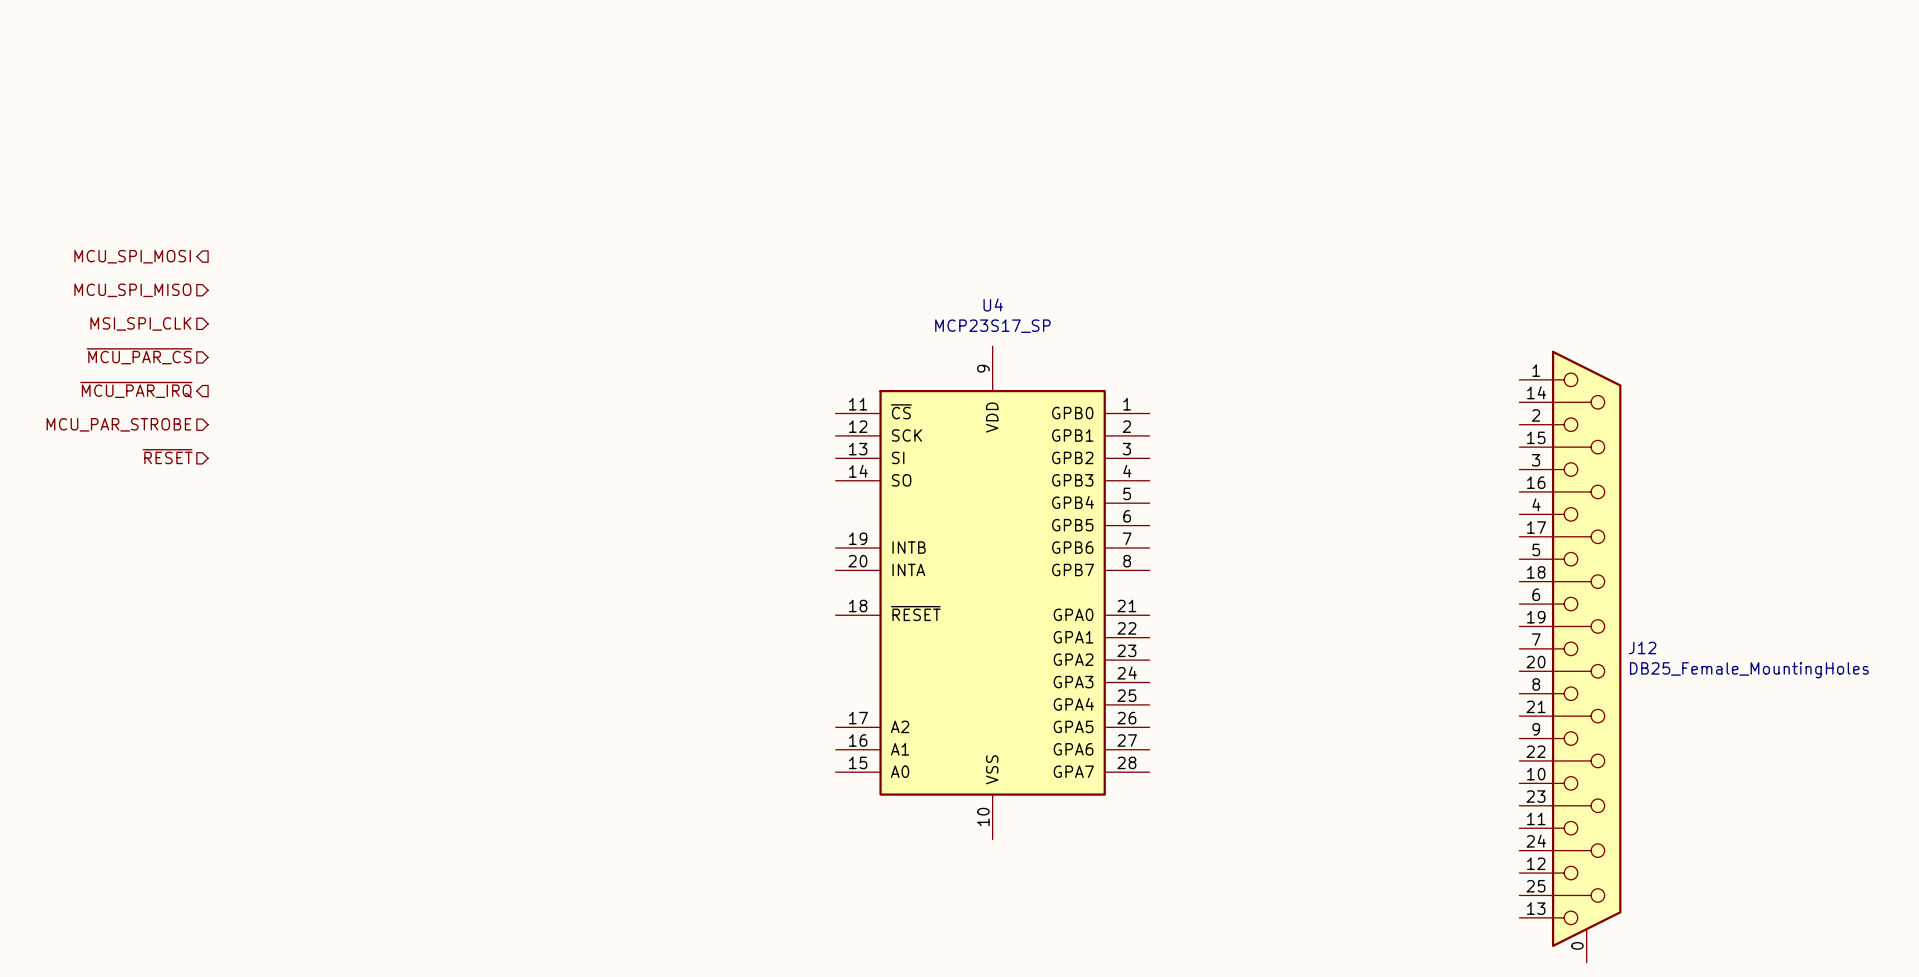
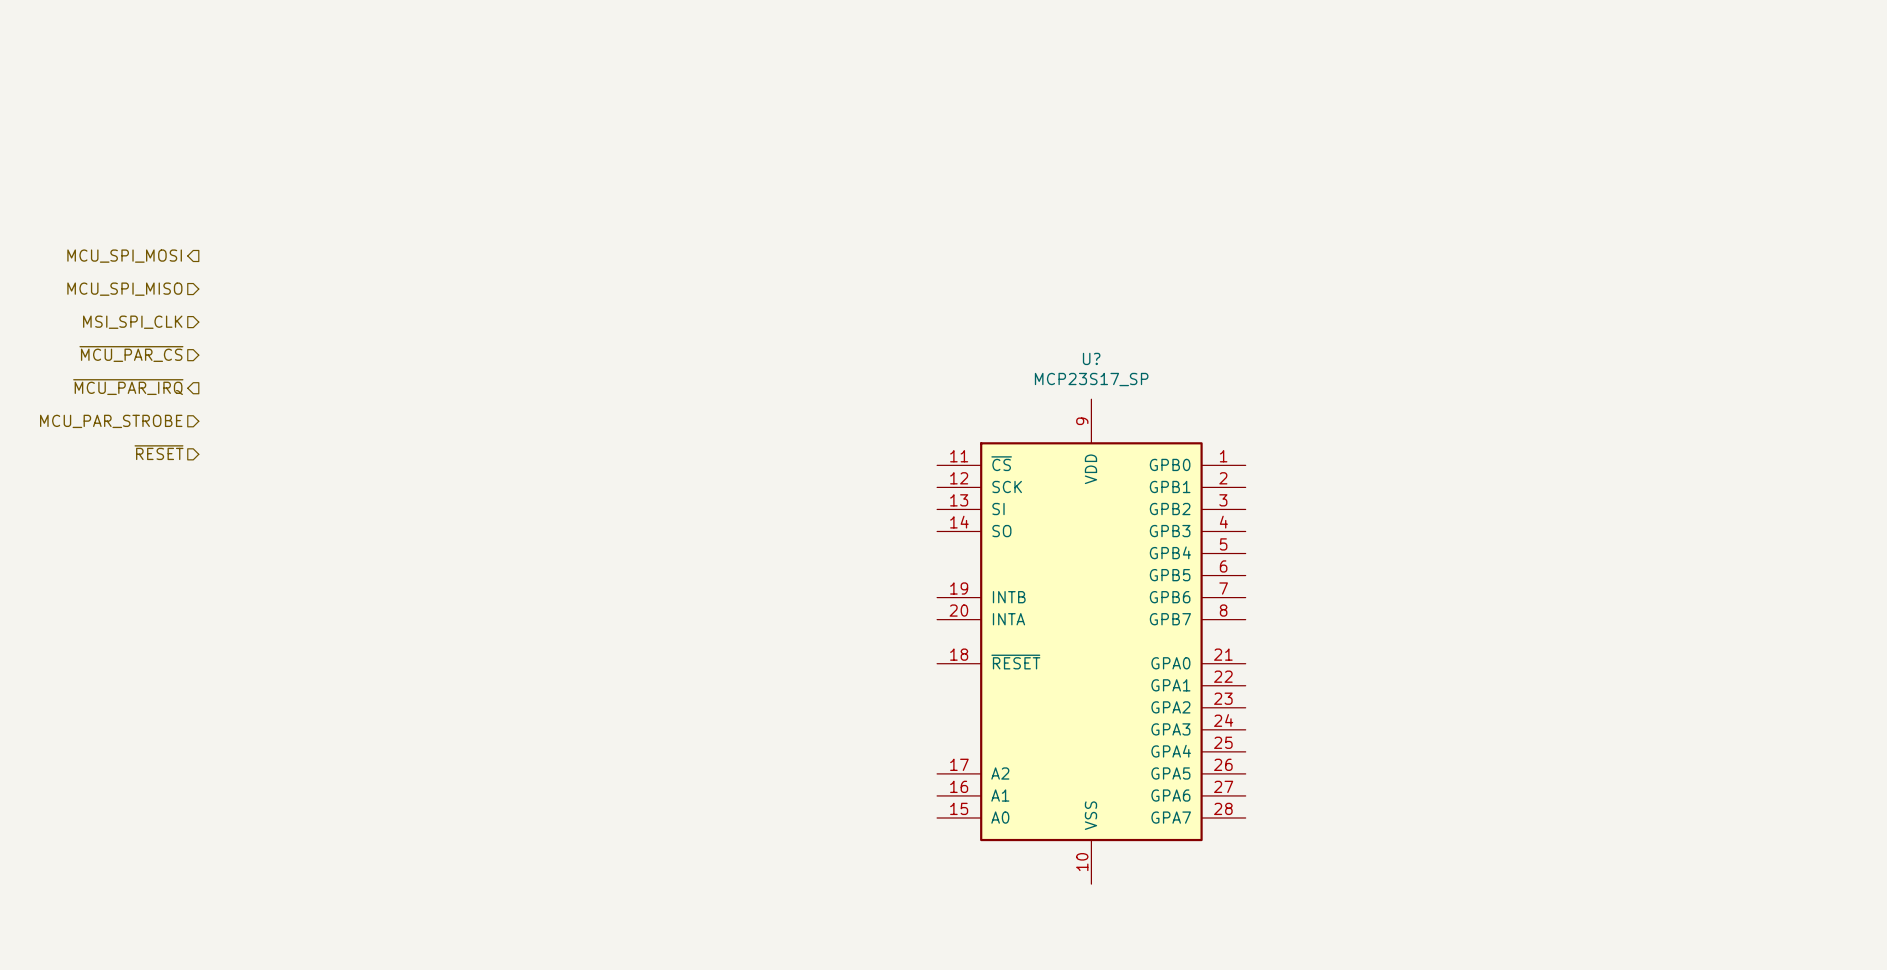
U4: MCP23S17_SP (992, 592) -> none
U?: none -> MCP23S17_SP (1091, 641)
J12: DB25_Female_MountingHoles (1570, 656) -> none

